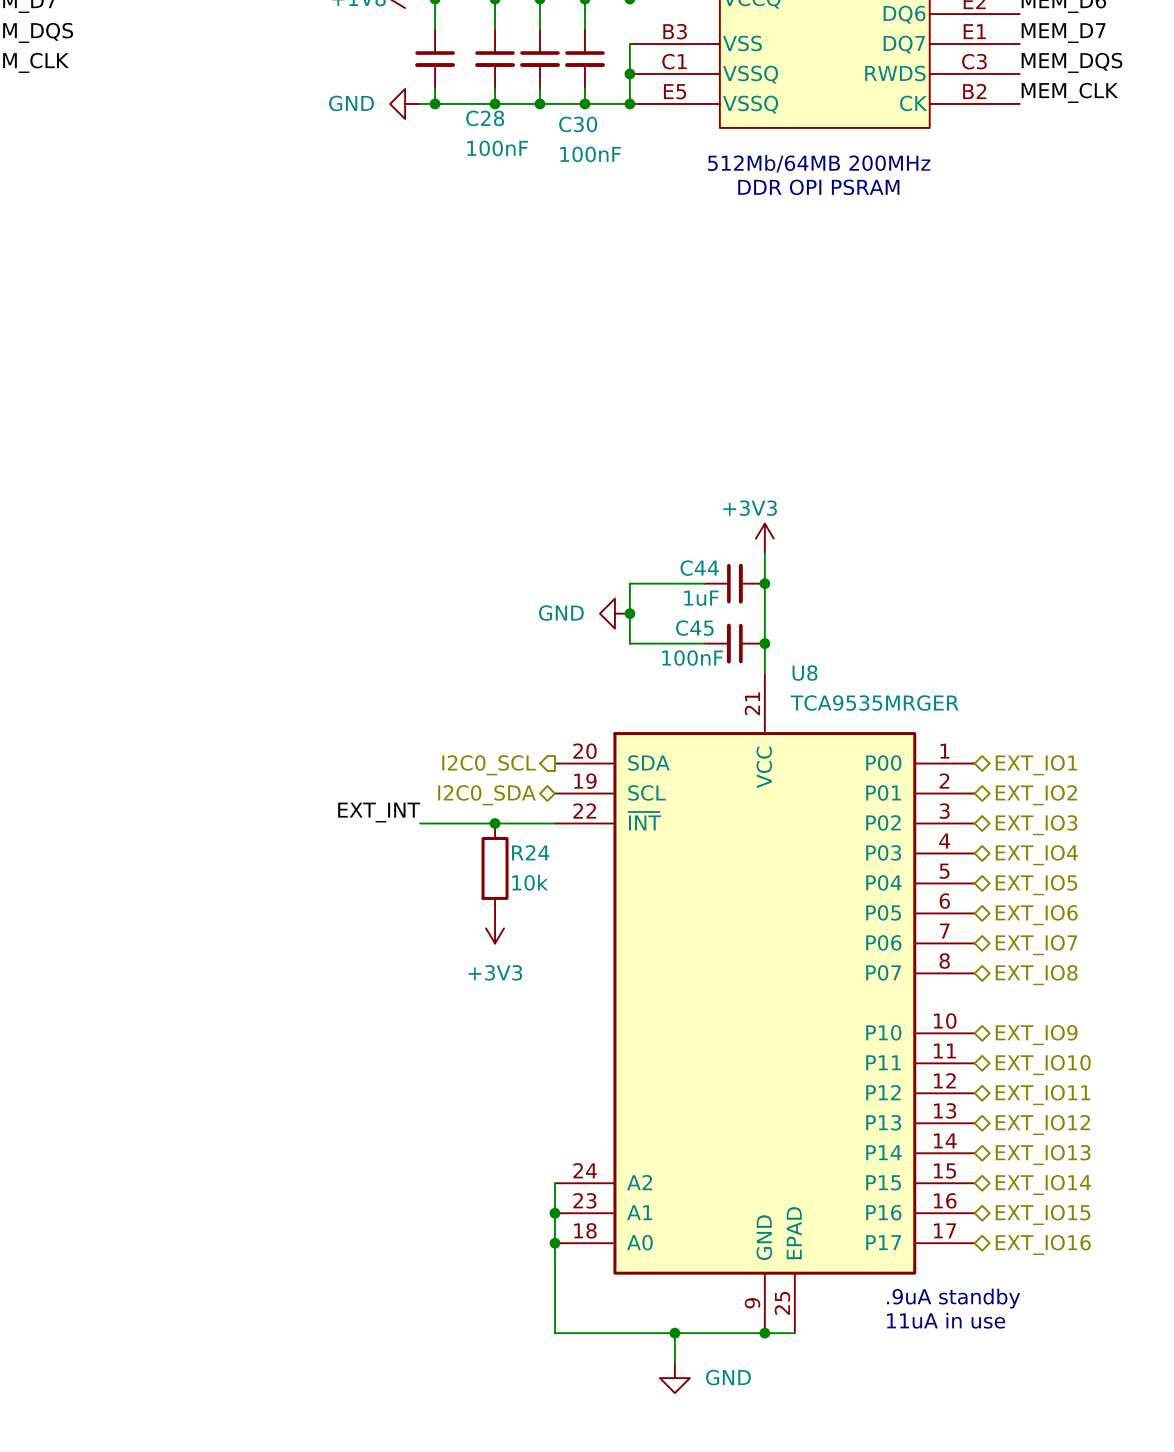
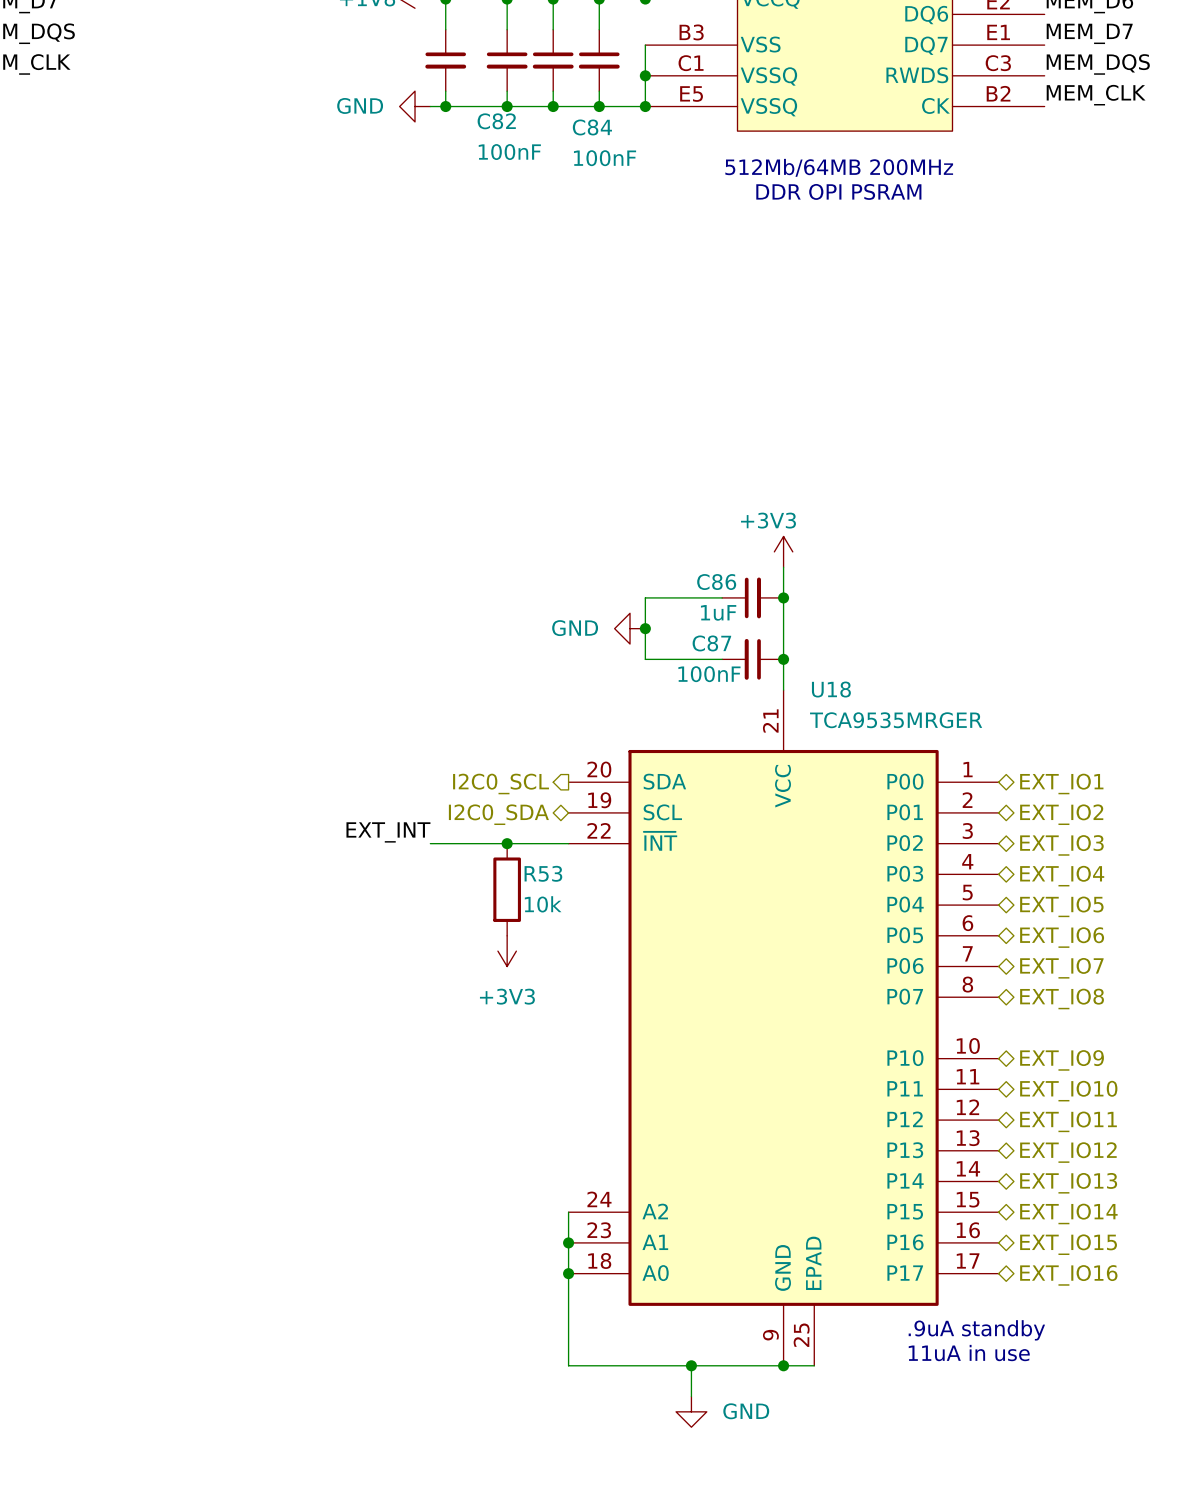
C28 name: C28 (485, 118) -> C82 (496, 121)
C30 name: C30 (578, 124) -> C84 (592, 127)
C44 name: C44 (699, 568) -> C86 (716, 582)
C45 name: C45 (694, 628) -> C87 (711, 643)
U8 name: U8 (805, 673) -> U18 (831, 689)
R24 name: R24 (530, 852) -> R53 (543, 873)

